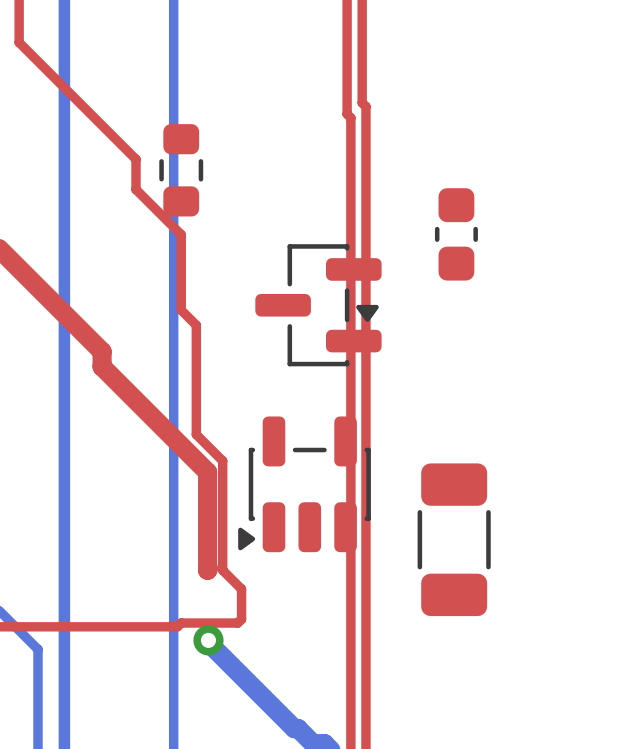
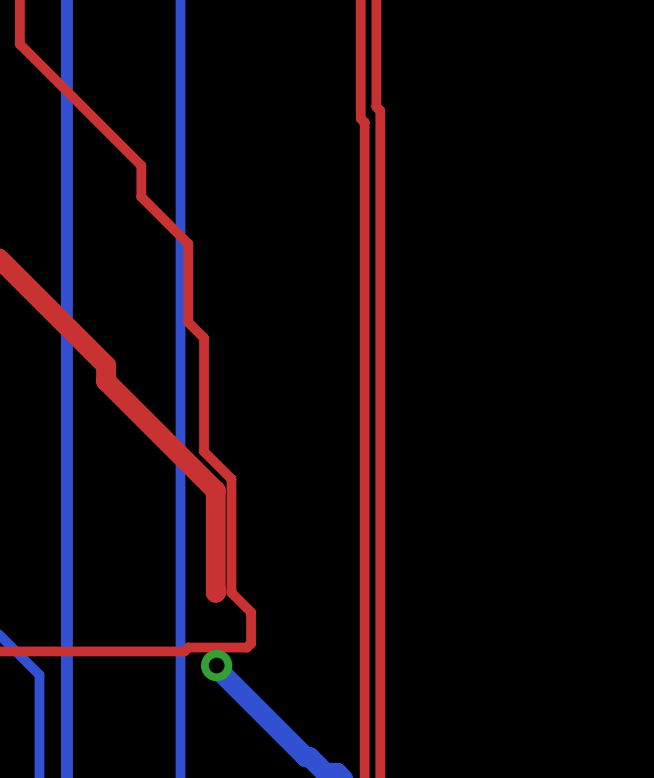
part: (181, 170) -> none
part: (456, 234) -> none
part: (318, 305) -> none
part: (304, 484) -> none
part: (454, 539) -> none

